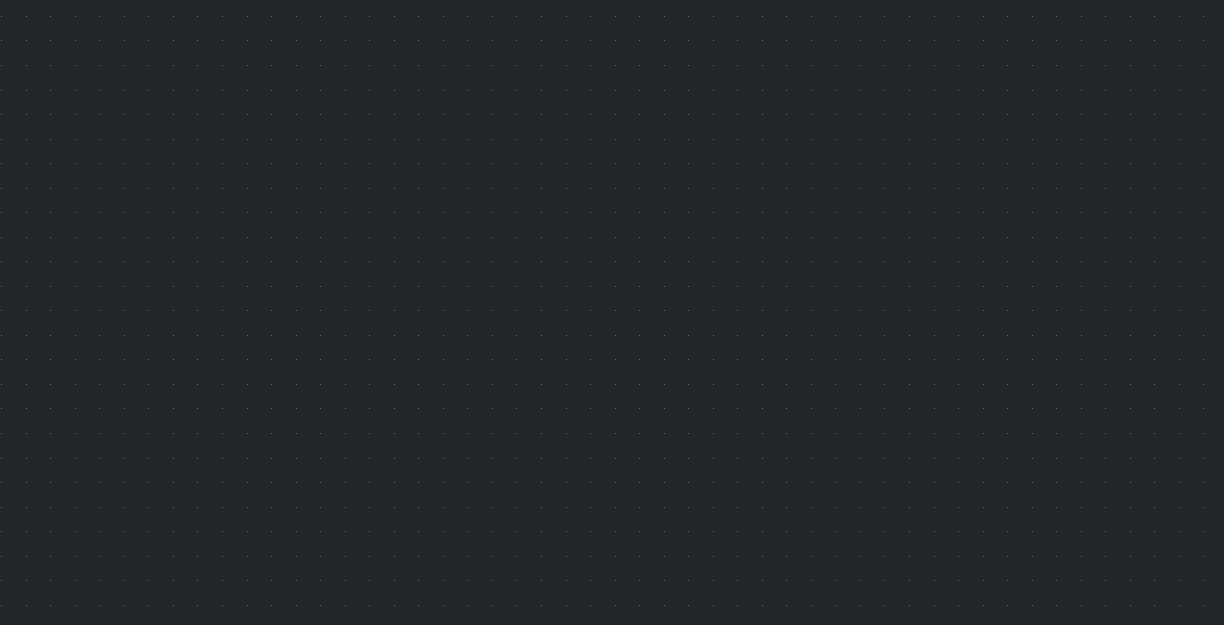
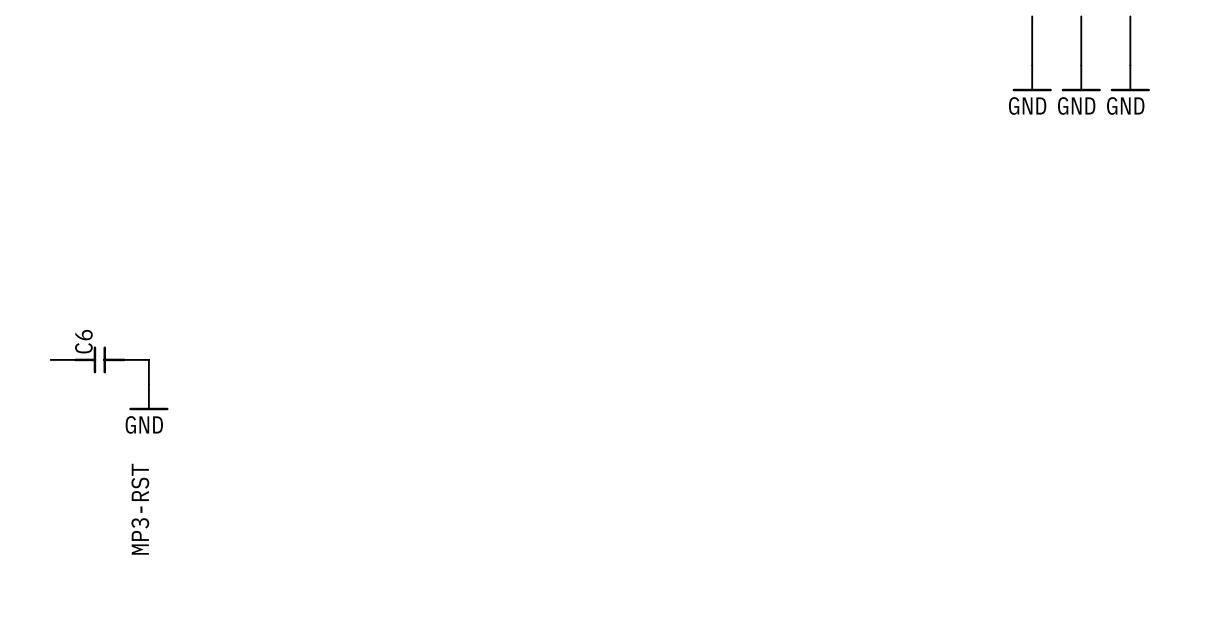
wire: none -> (1032, 16) (1032, 65)
wire: none -> (1081, 16) (1081, 65)
wire: none -> (1130, 16) (1130, 65)
power symbol: none -> GND (1032, 78)
power symbol: none -> GND (1081, 78)
power symbol: none -> GND (1130, 78)
wire: none -> (50, 359) (75, 359)
C6: none -> (99, 359)
wire: none -> (124, 359) (148, 359) (148, 384)
power symbol: none -> GND (148, 397)
label: none -> MP3-RST (140, 509)

